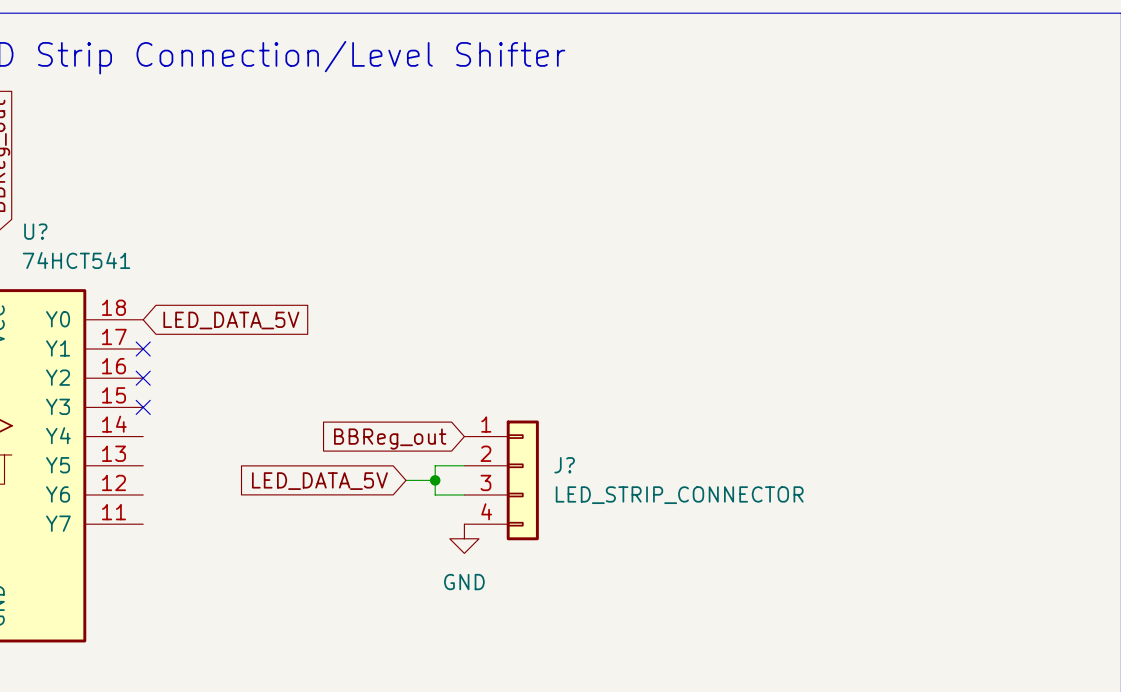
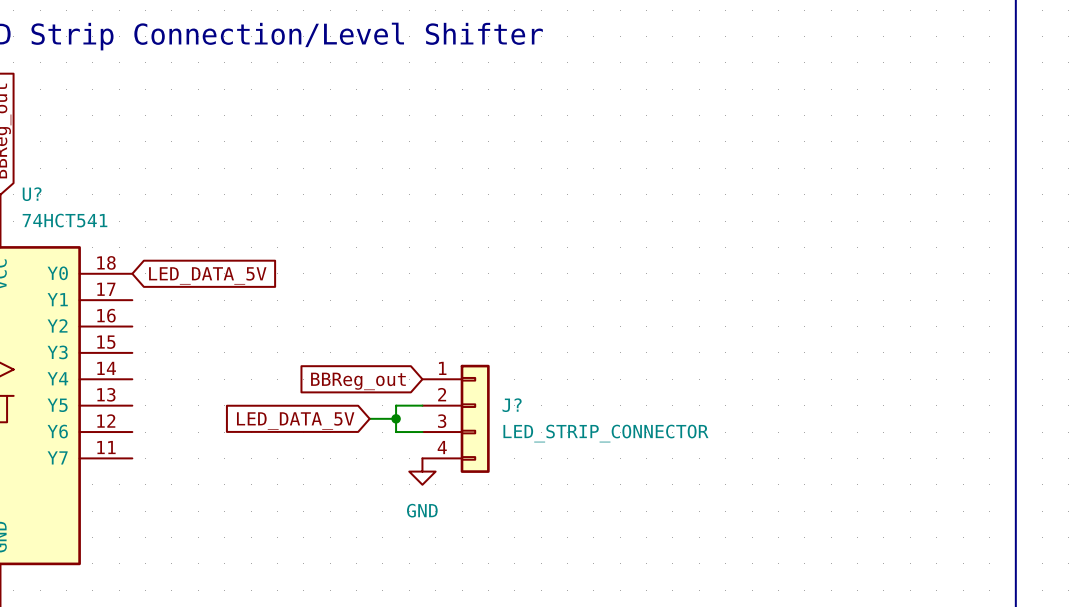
no-connect mark: (143, 348) -> none
no-connect mark: (143, 378) -> none
no-connect mark: (143, 407) -> none

